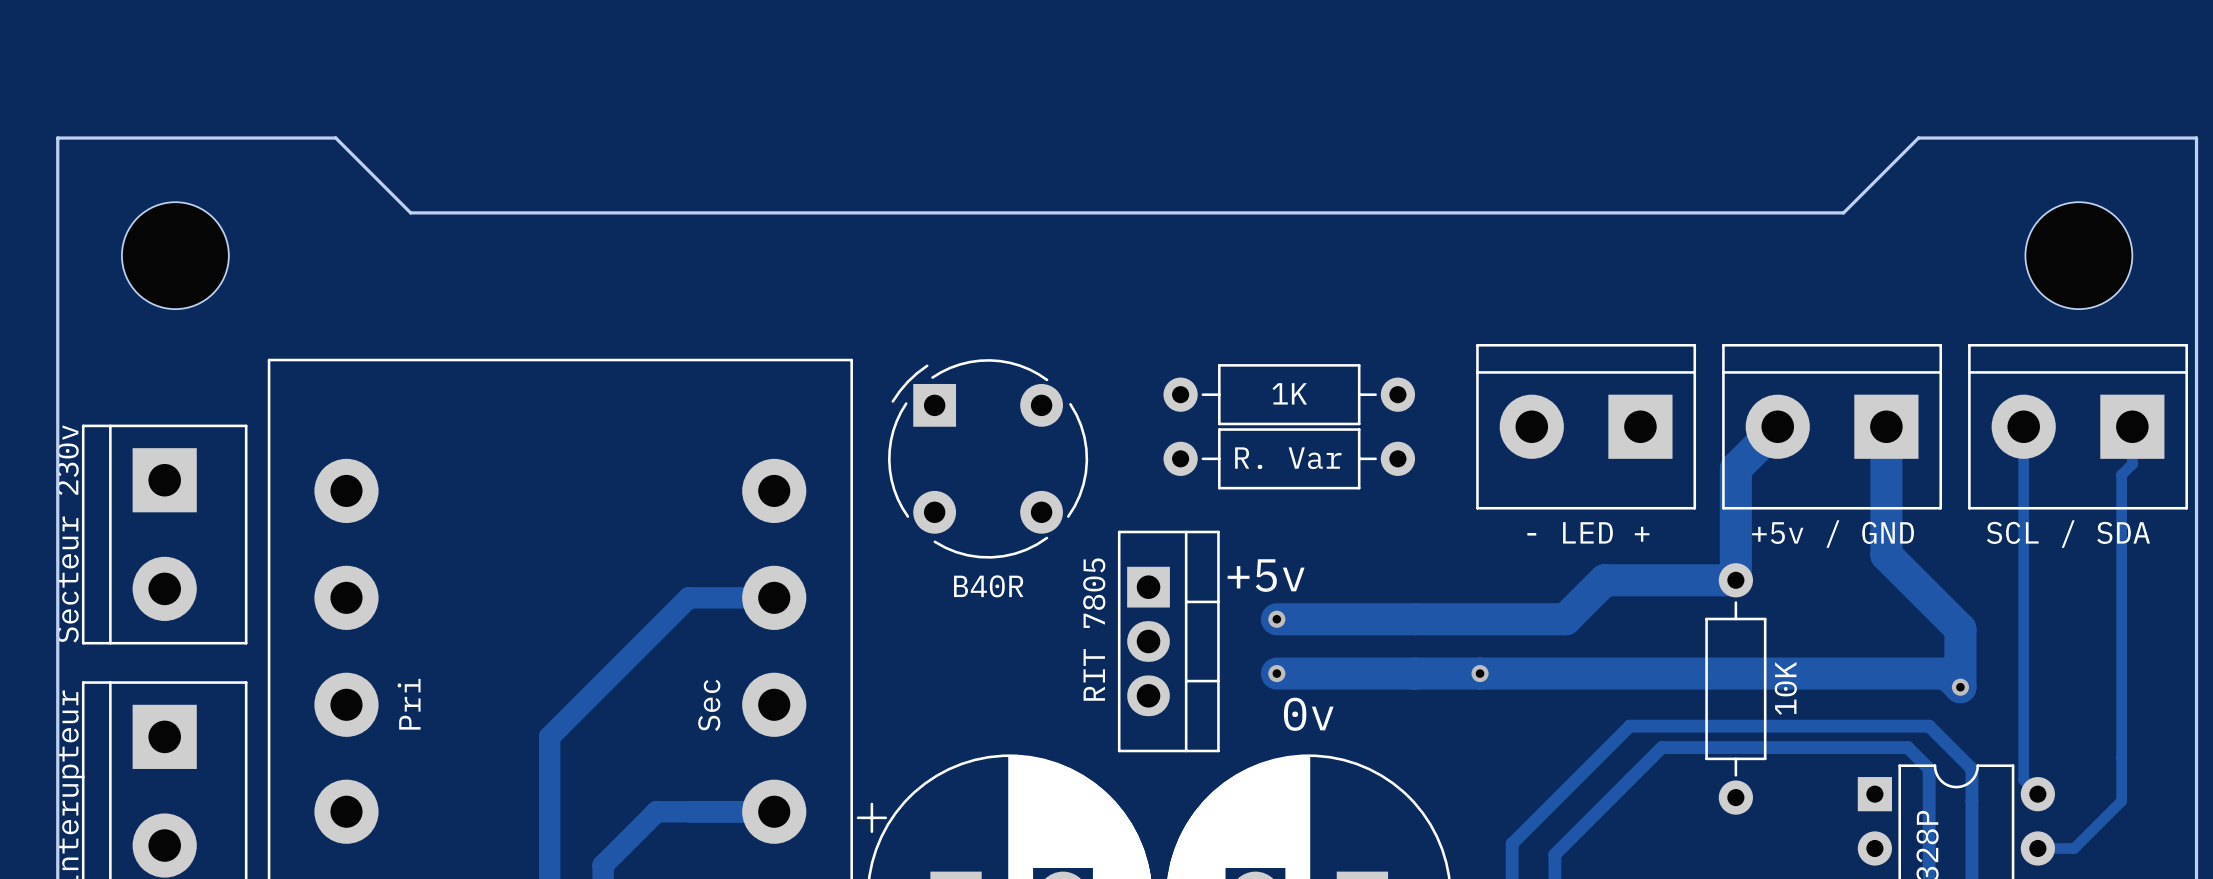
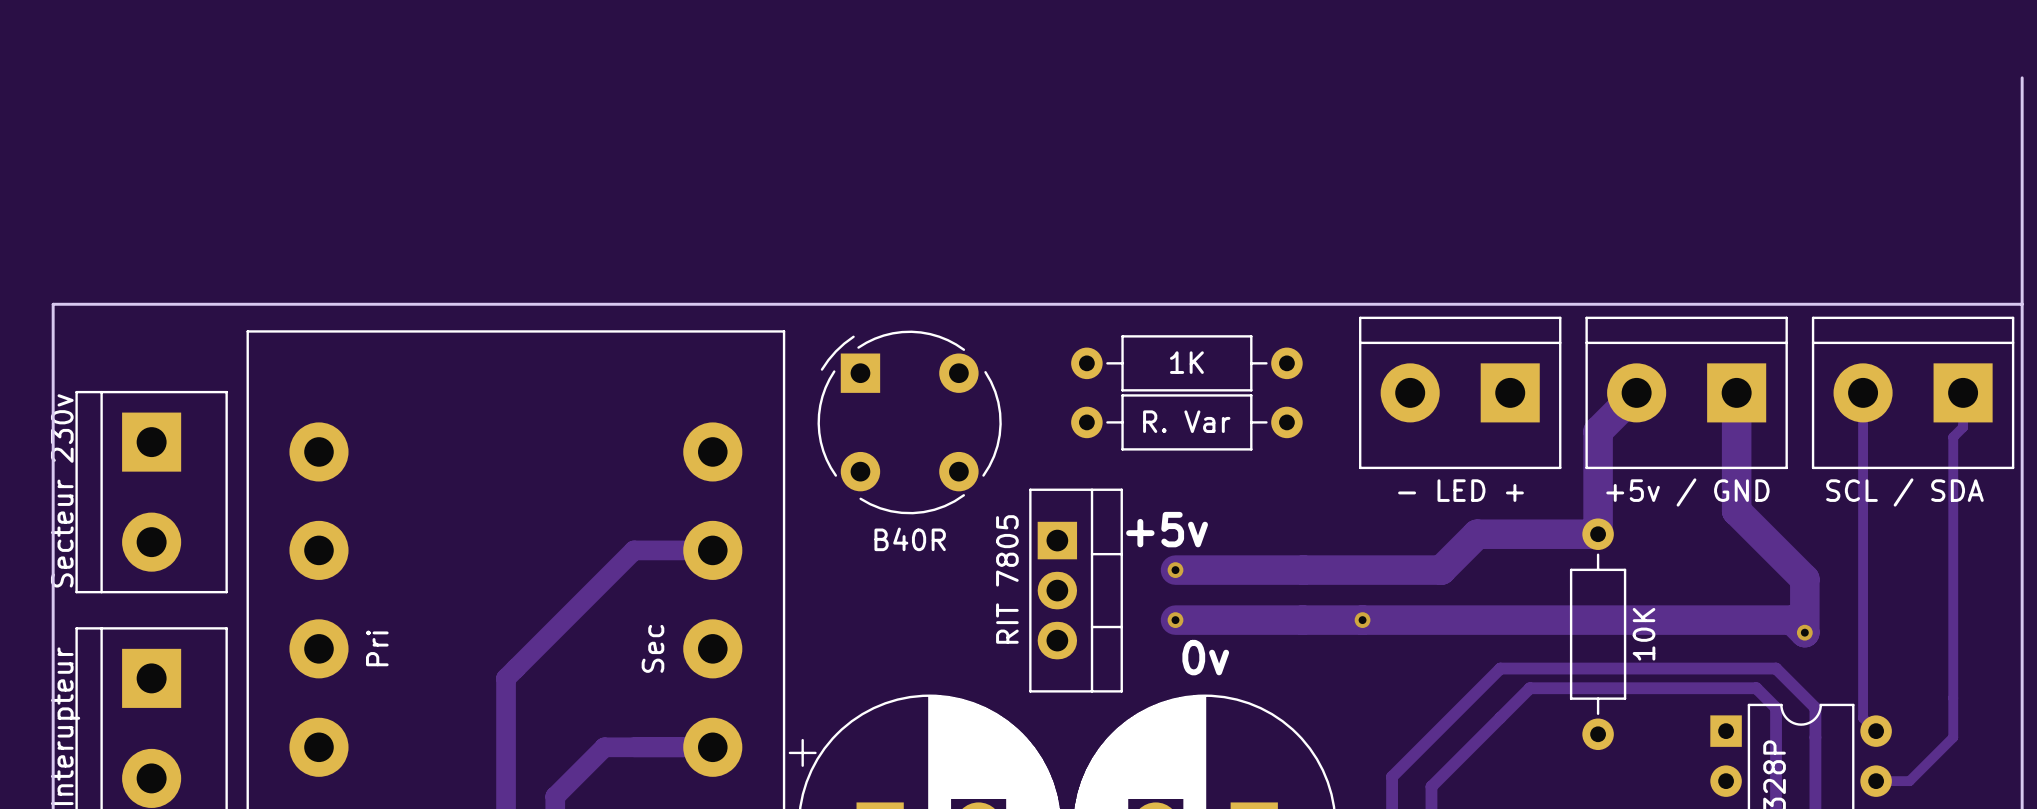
board edge: none -> (2022, 77) (2022, 127)
board edge: (2196, 138) (1918, 138) (1843, 212) (410, 212) (335, 138) (57, 138) (57, 330) -> (2022, 304) (53, 304)
part: (175, 255) -> none
part: (2078, 255) -> none

